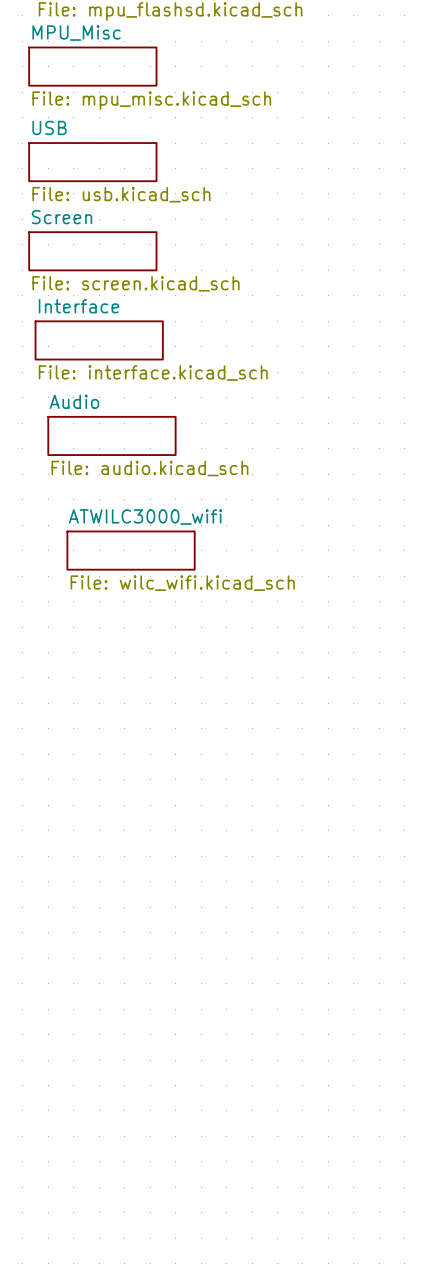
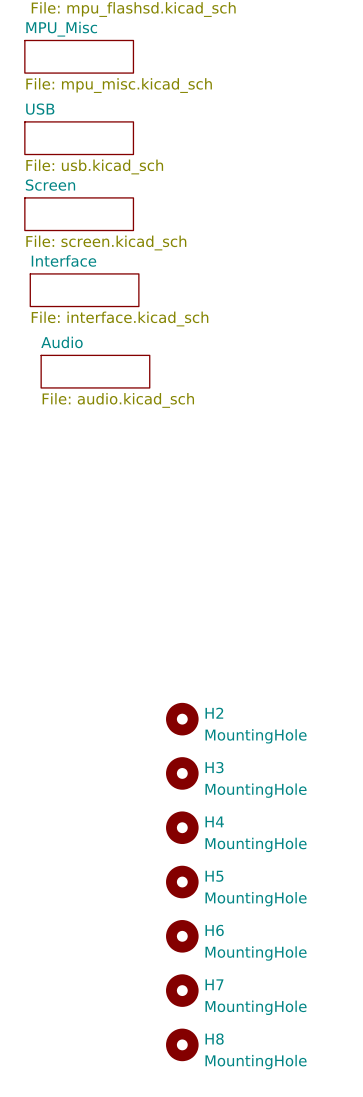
sheet ATWILC3000_wifi: File: wilc_wifi.kicad_sch (131, 550) -> none
H2: none -> MountingHole (182, 719)
H3: none -> MountingHole (182, 773)
H4: none -> MountingHole (182, 827)
H5: none -> MountingHole (182, 882)
H6: none -> MountingHole (182, 936)
H7: none -> MountingHole (182, 990)
H8: none -> MountingHole (182, 1044)

